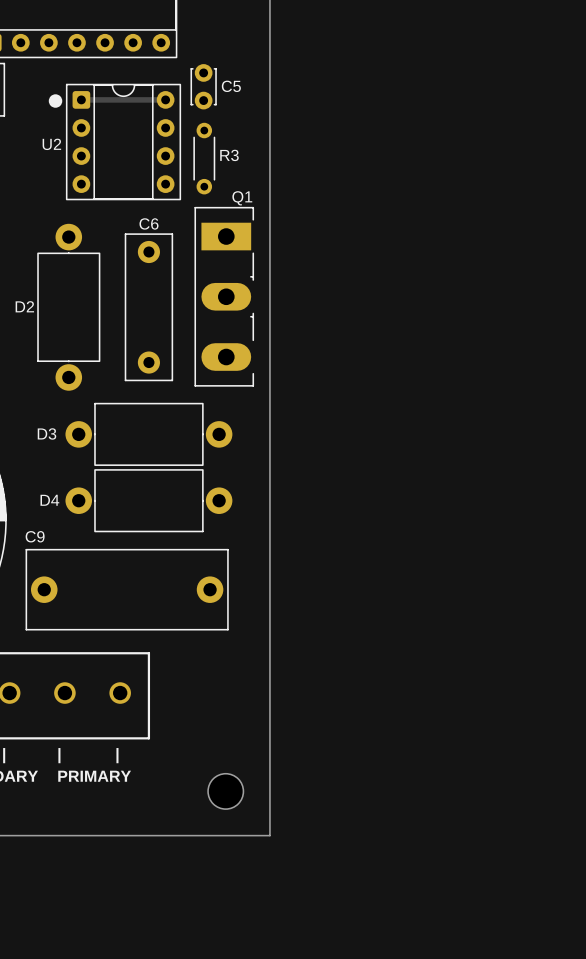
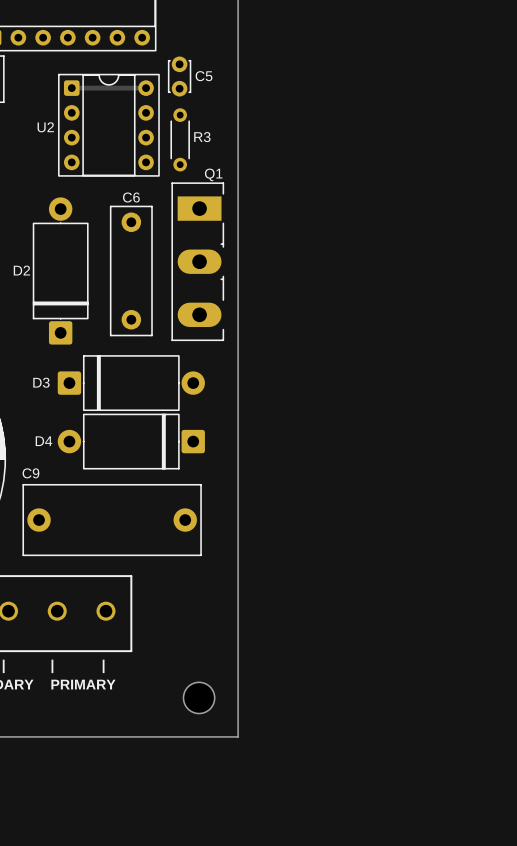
drawing: [48, 94, 63, 108] -> none
D2 footprint: [37, 223, 101, 391] -> [32, 197, 89, 345]
D3 footprint: [65, 402, 233, 466] -> [57, 355, 205, 411]
D4 footprint: [65, 469, 233, 533] -> [57, 413, 205, 470]

